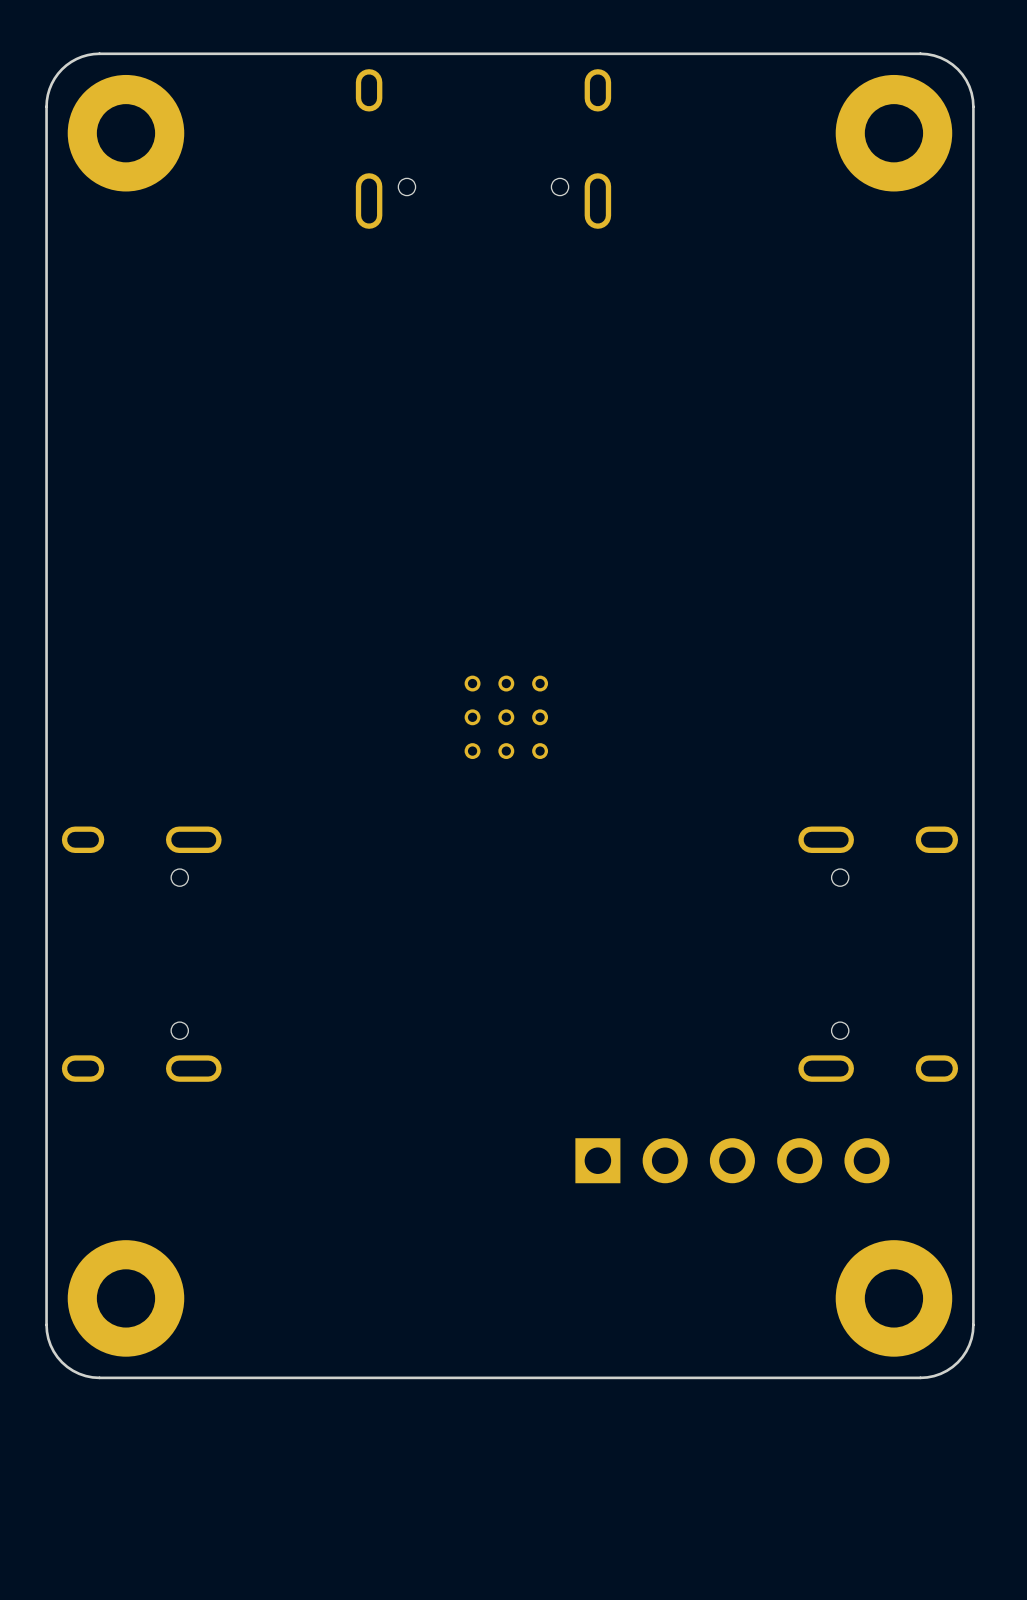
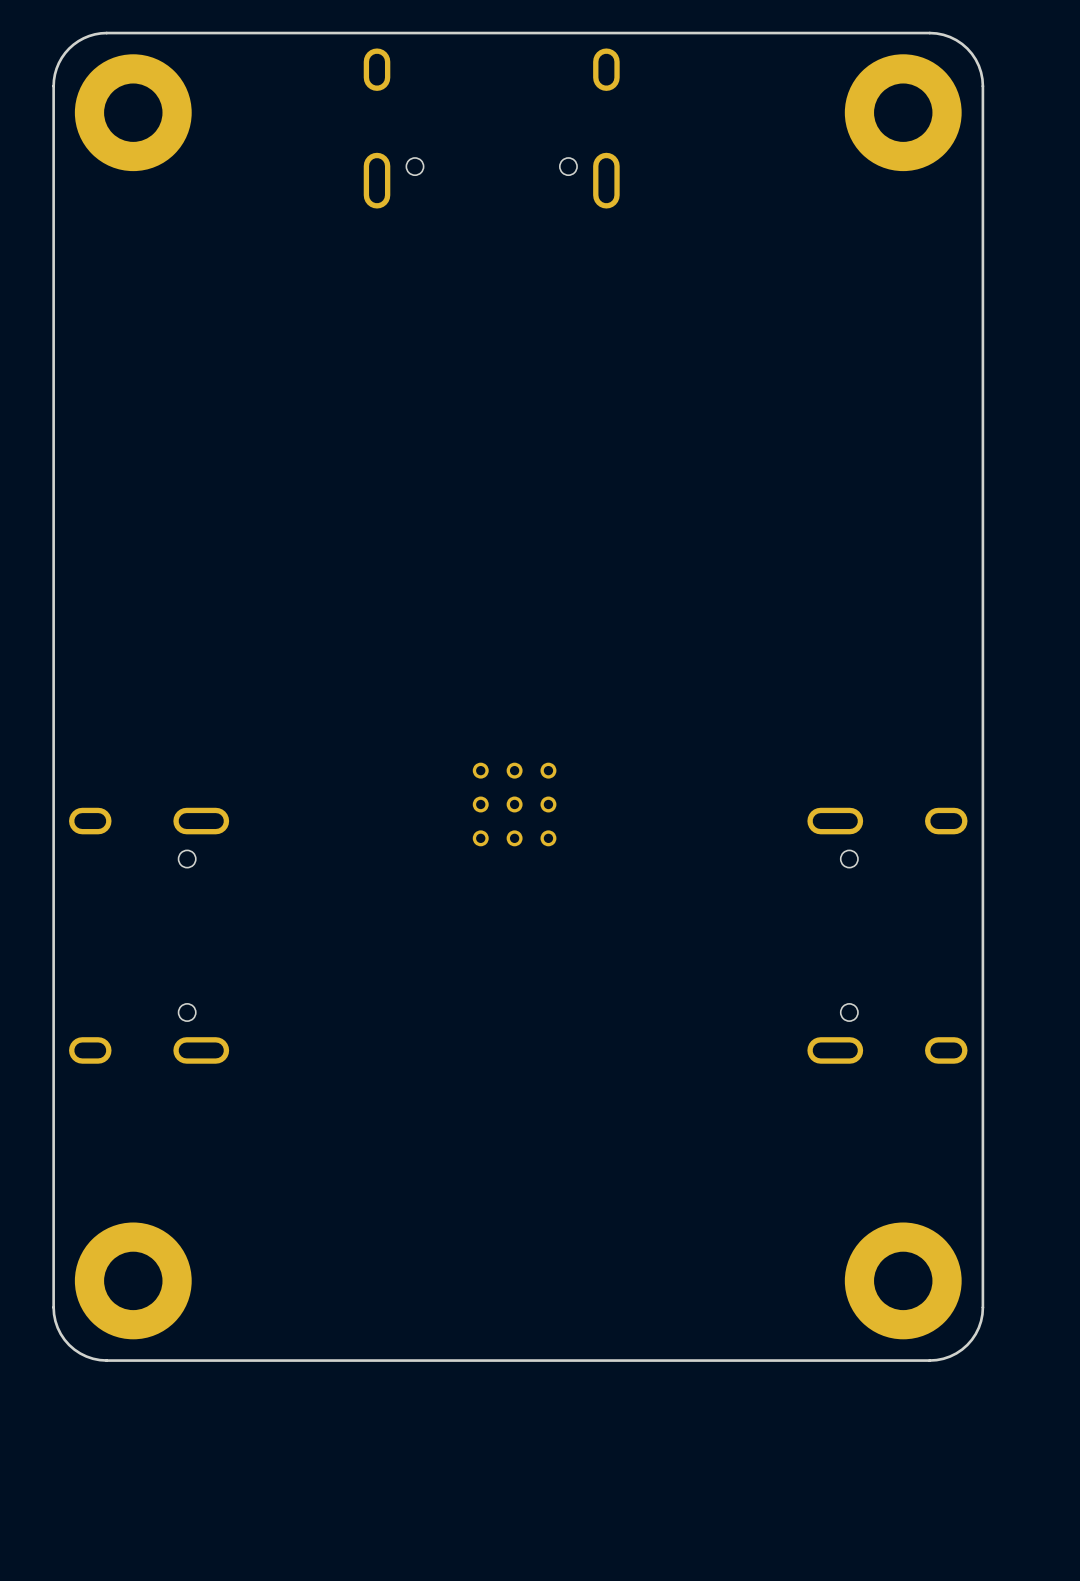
part position: (506, 717) -> (514, 804)
part: (732, 1160) -> none

